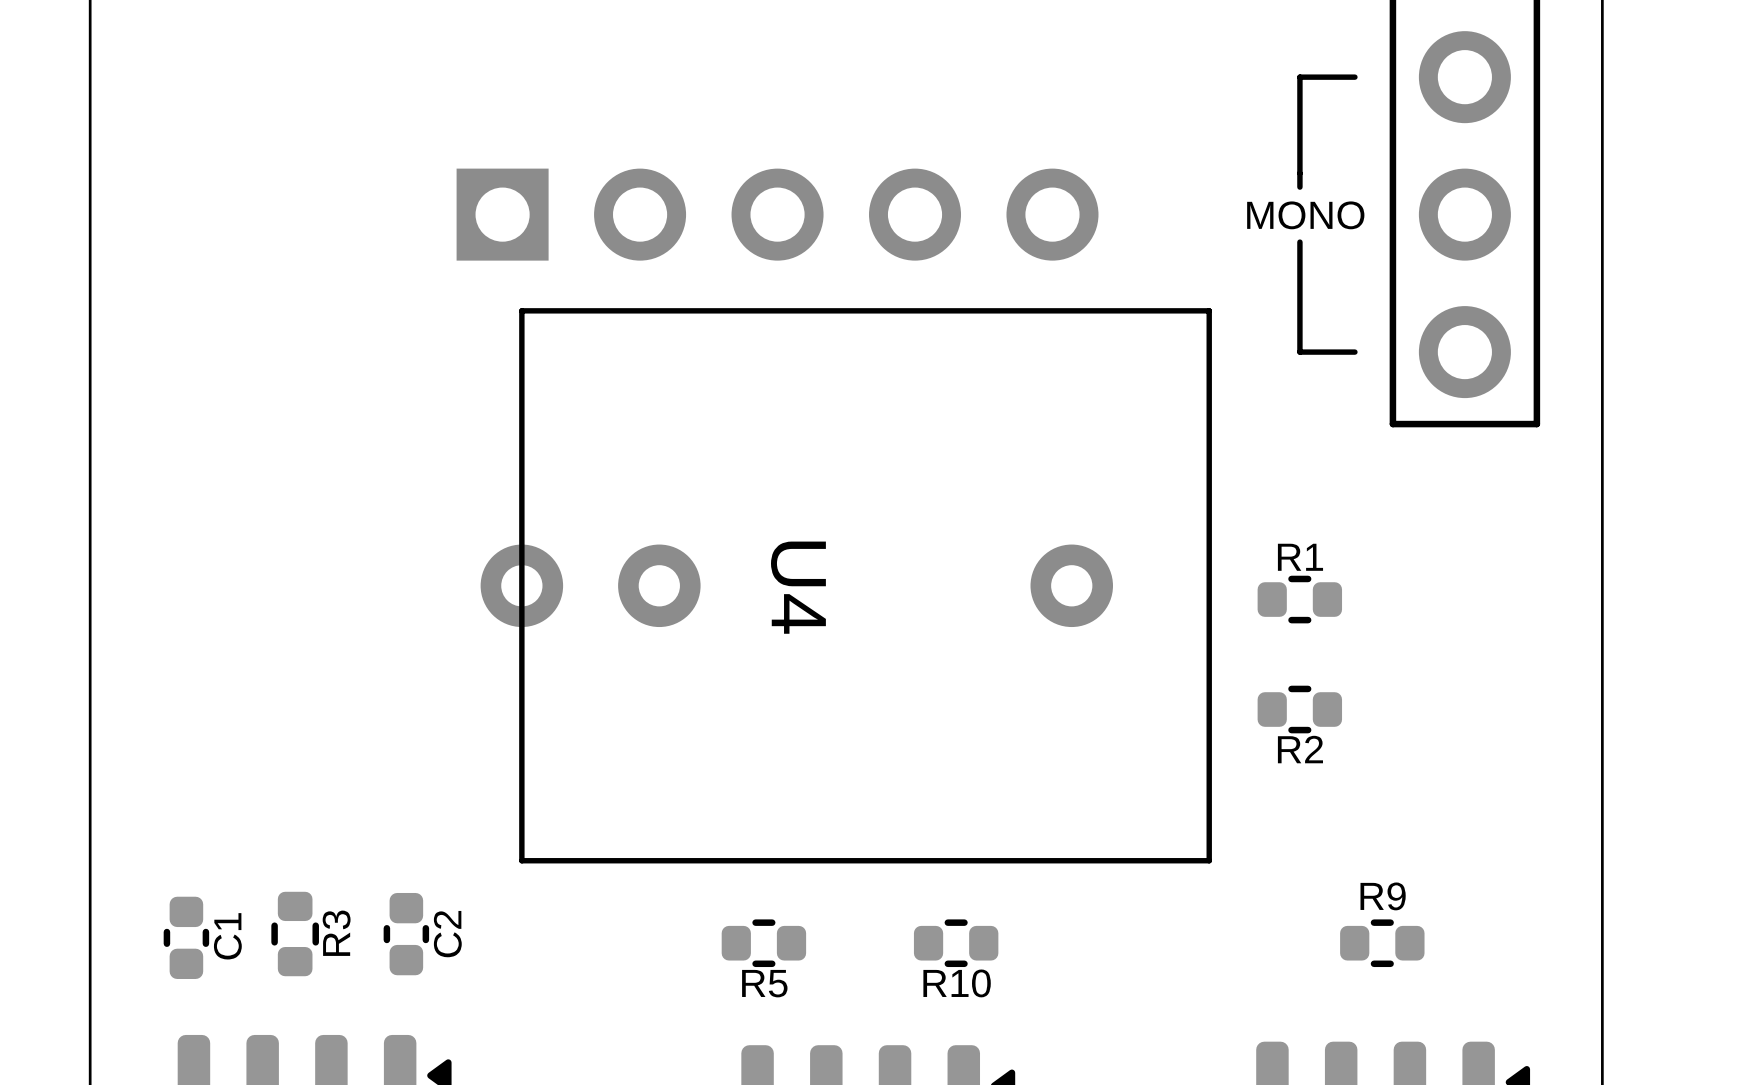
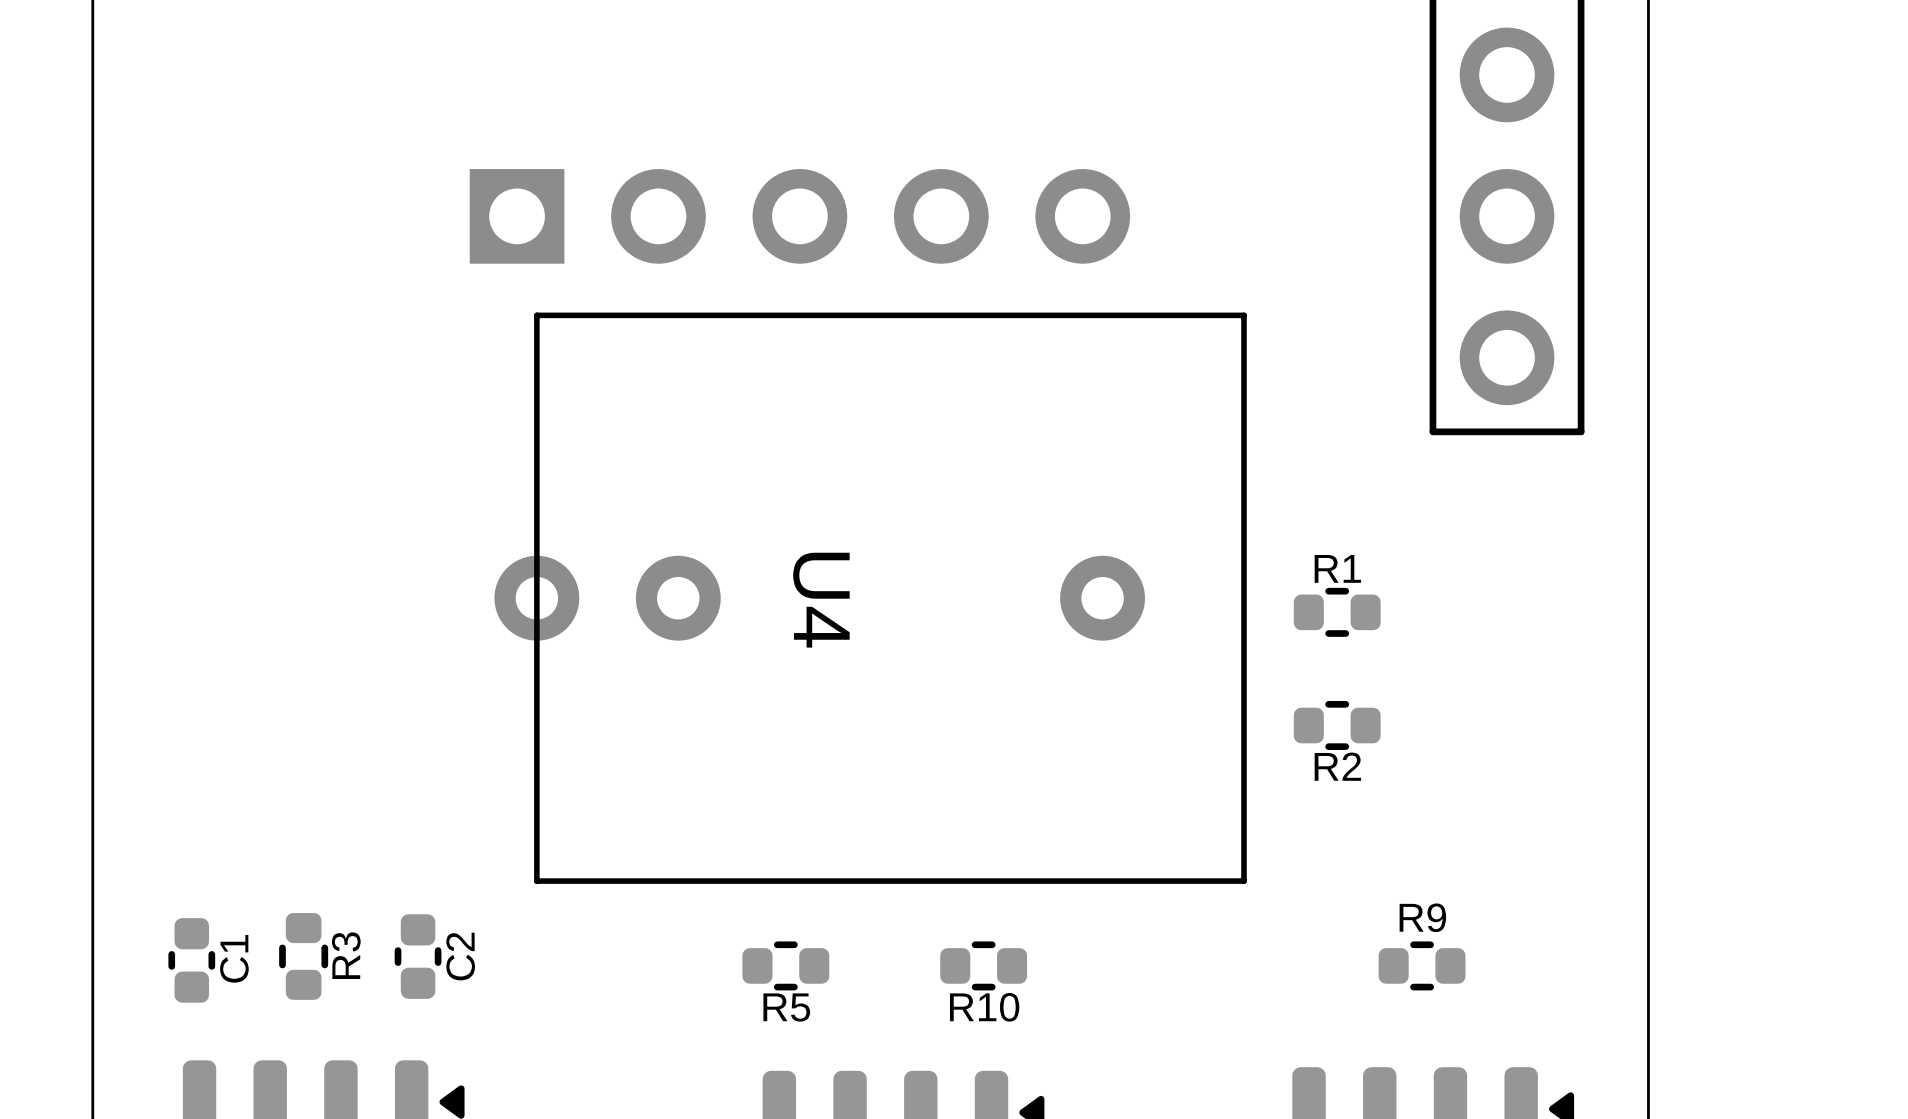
line: (1354, 77) (1299, 77) (1299, 187) -> none
text: MONO (1305, 215) -> none
line: (1299, 242) (1299, 352) (1354, 352) -> none

